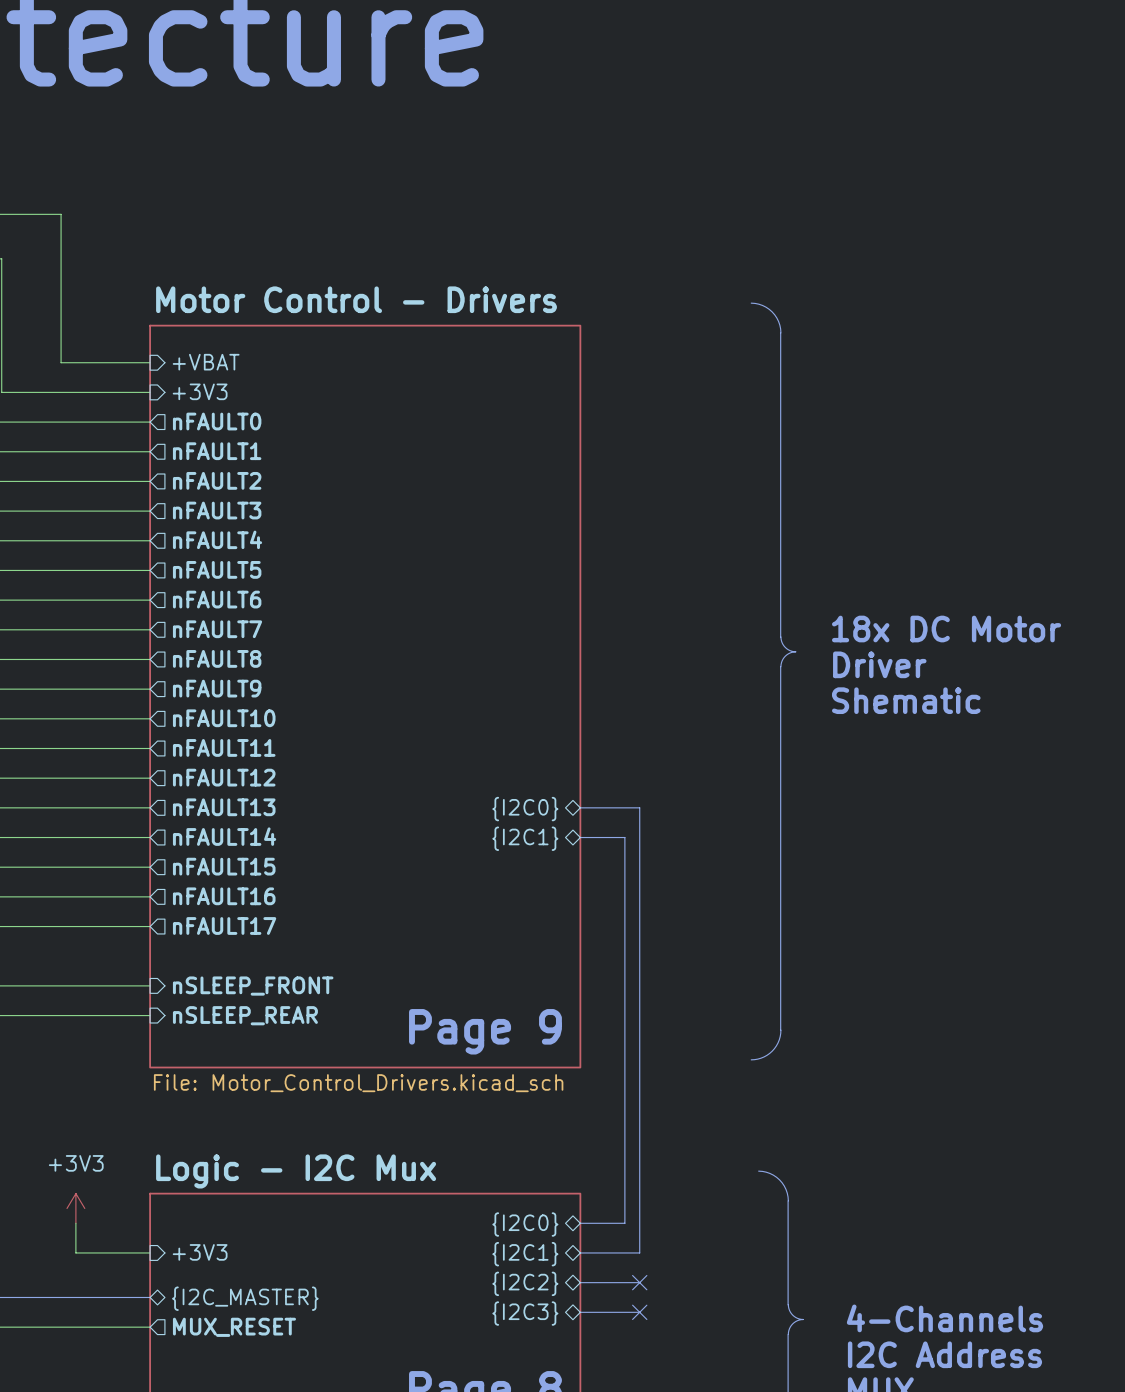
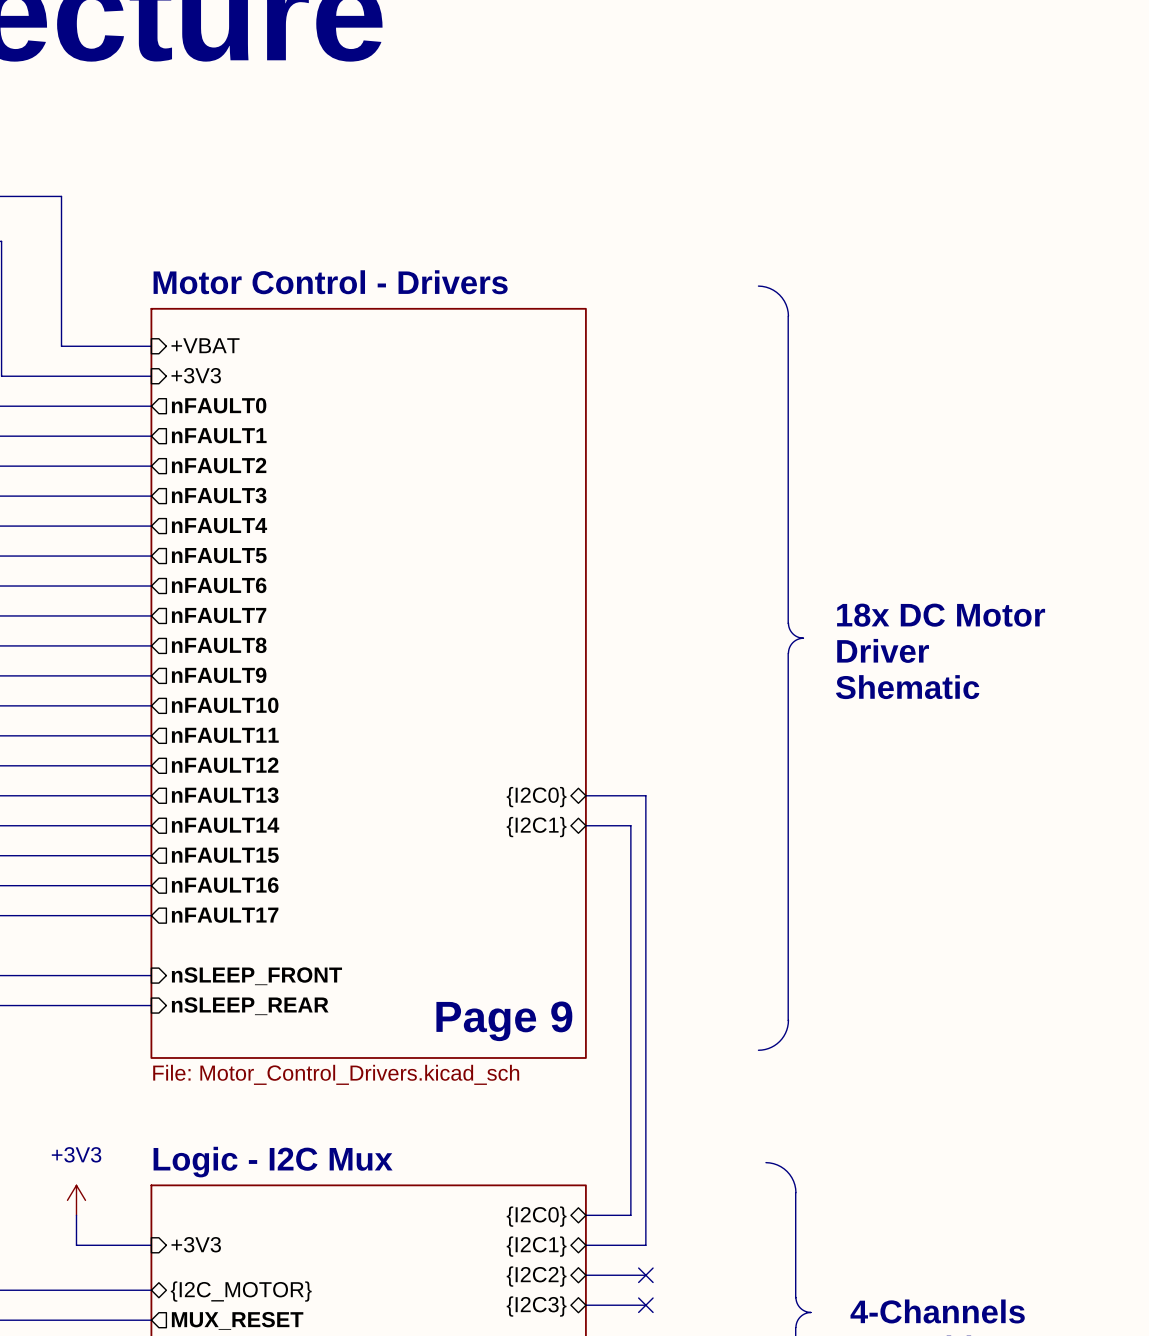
sheet pin: {I2C_MASTER} (245, 1298) -> {I2C_MOTOR} (241, 1291)

